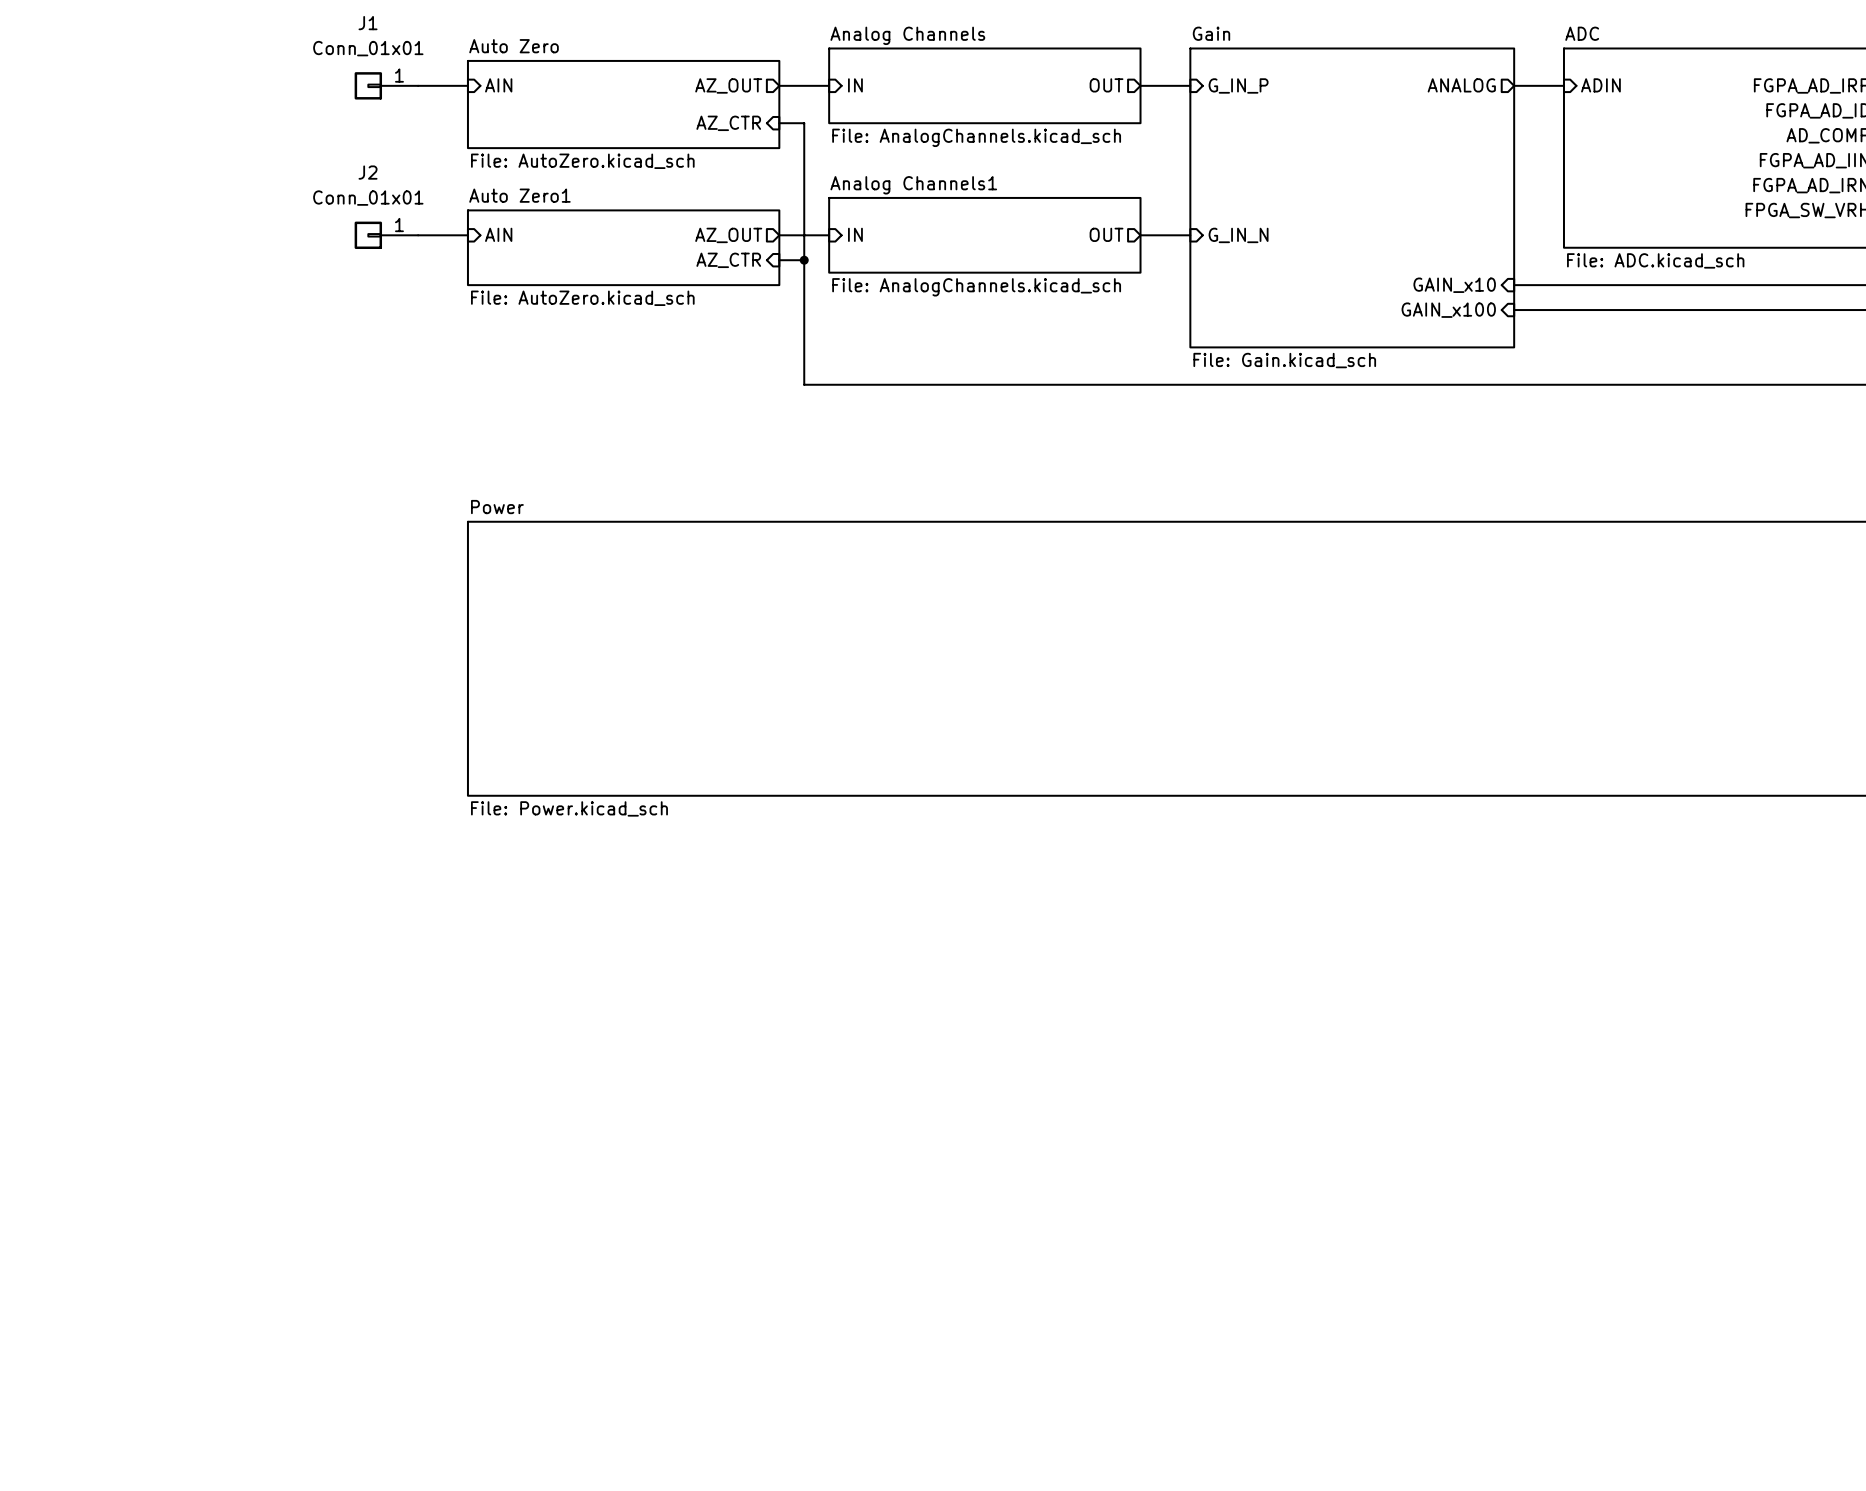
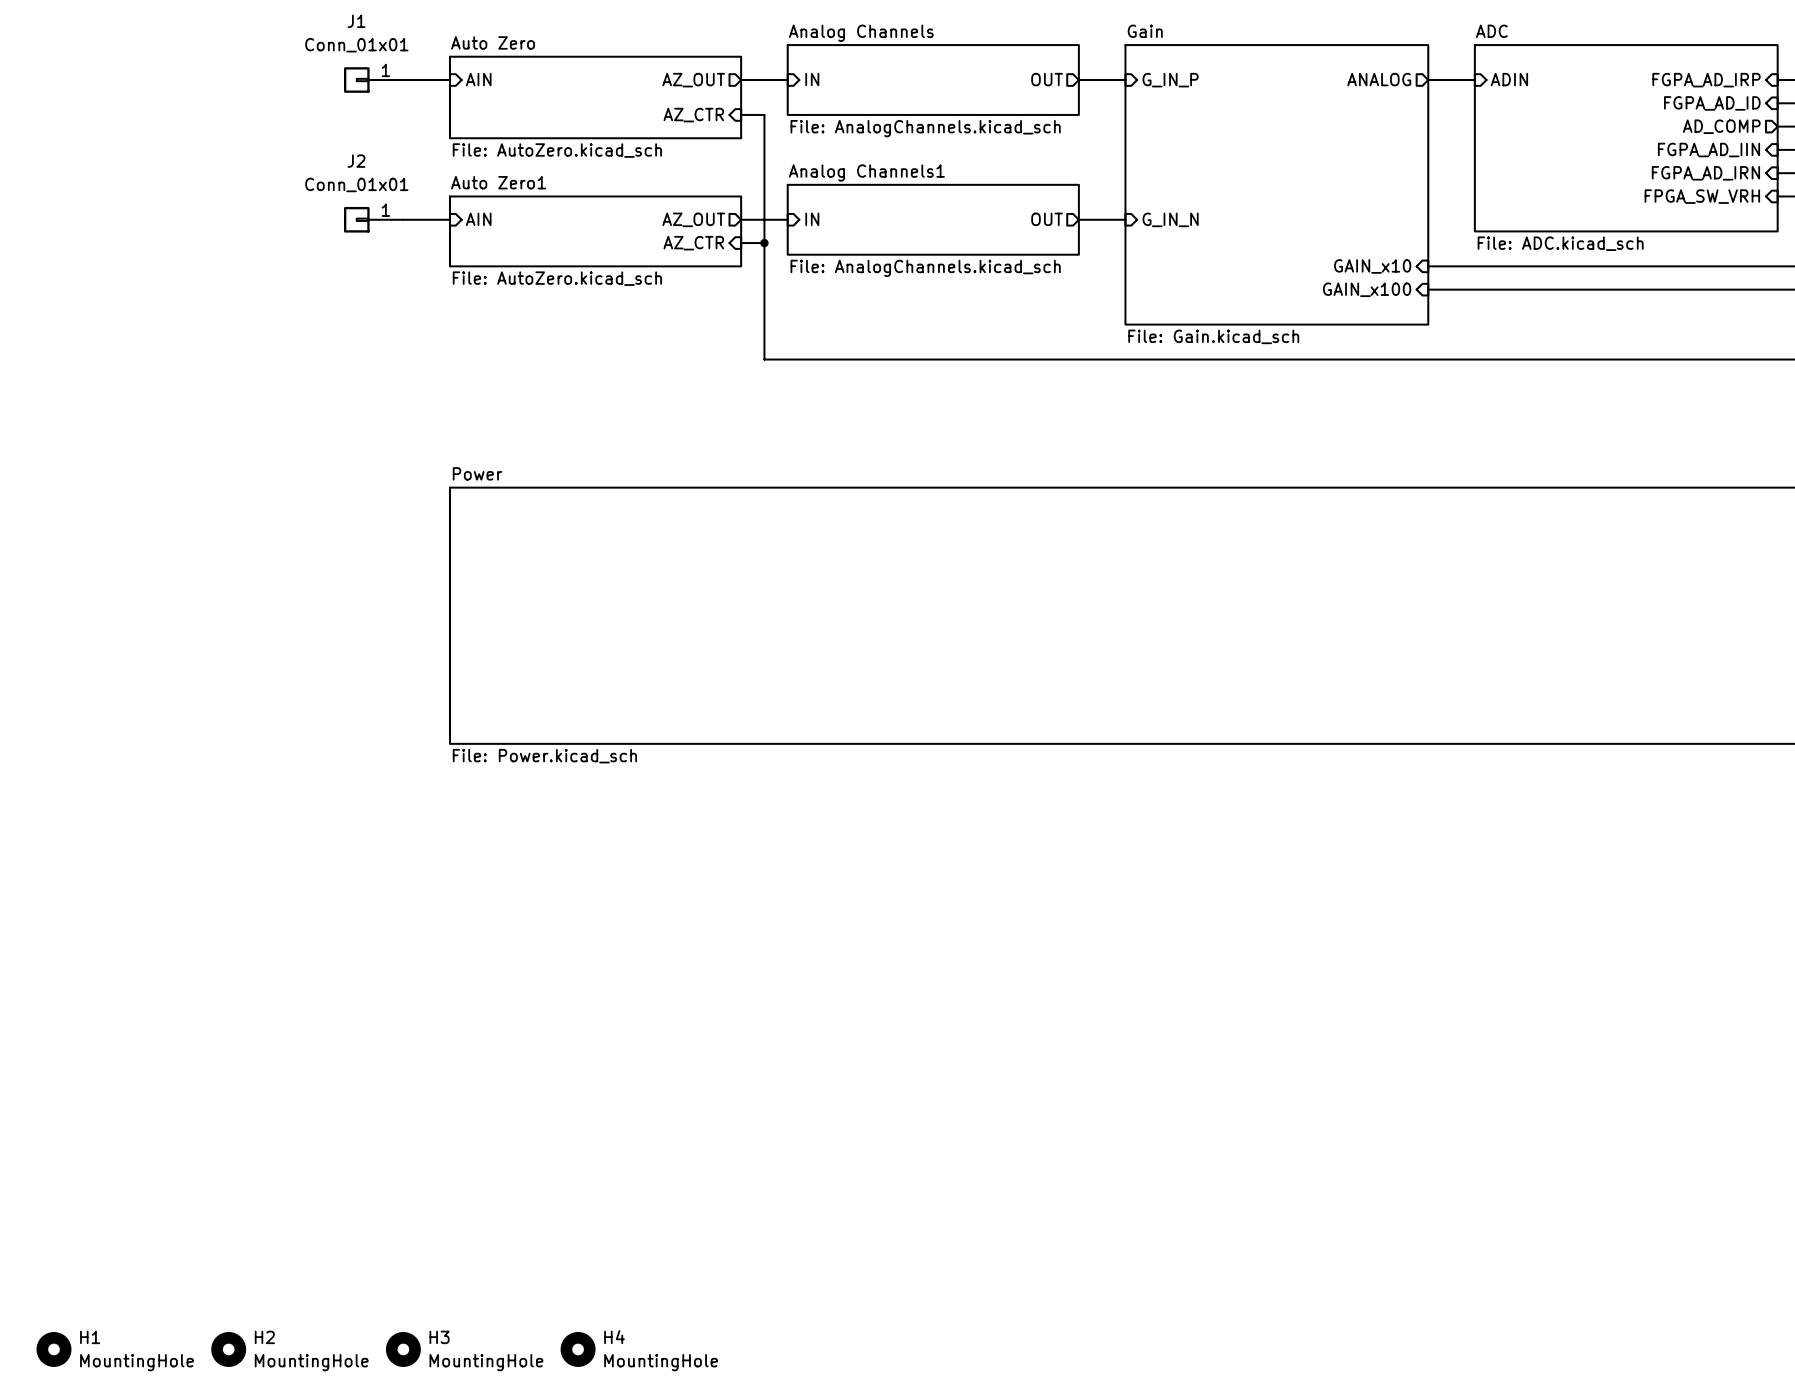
H1: none -> MountingHole (54, 1349)
H2: none -> MountingHole (228, 1349)
H3: none -> MountingHole (403, 1349)
H4: none -> MountingHole (578, 1349)

